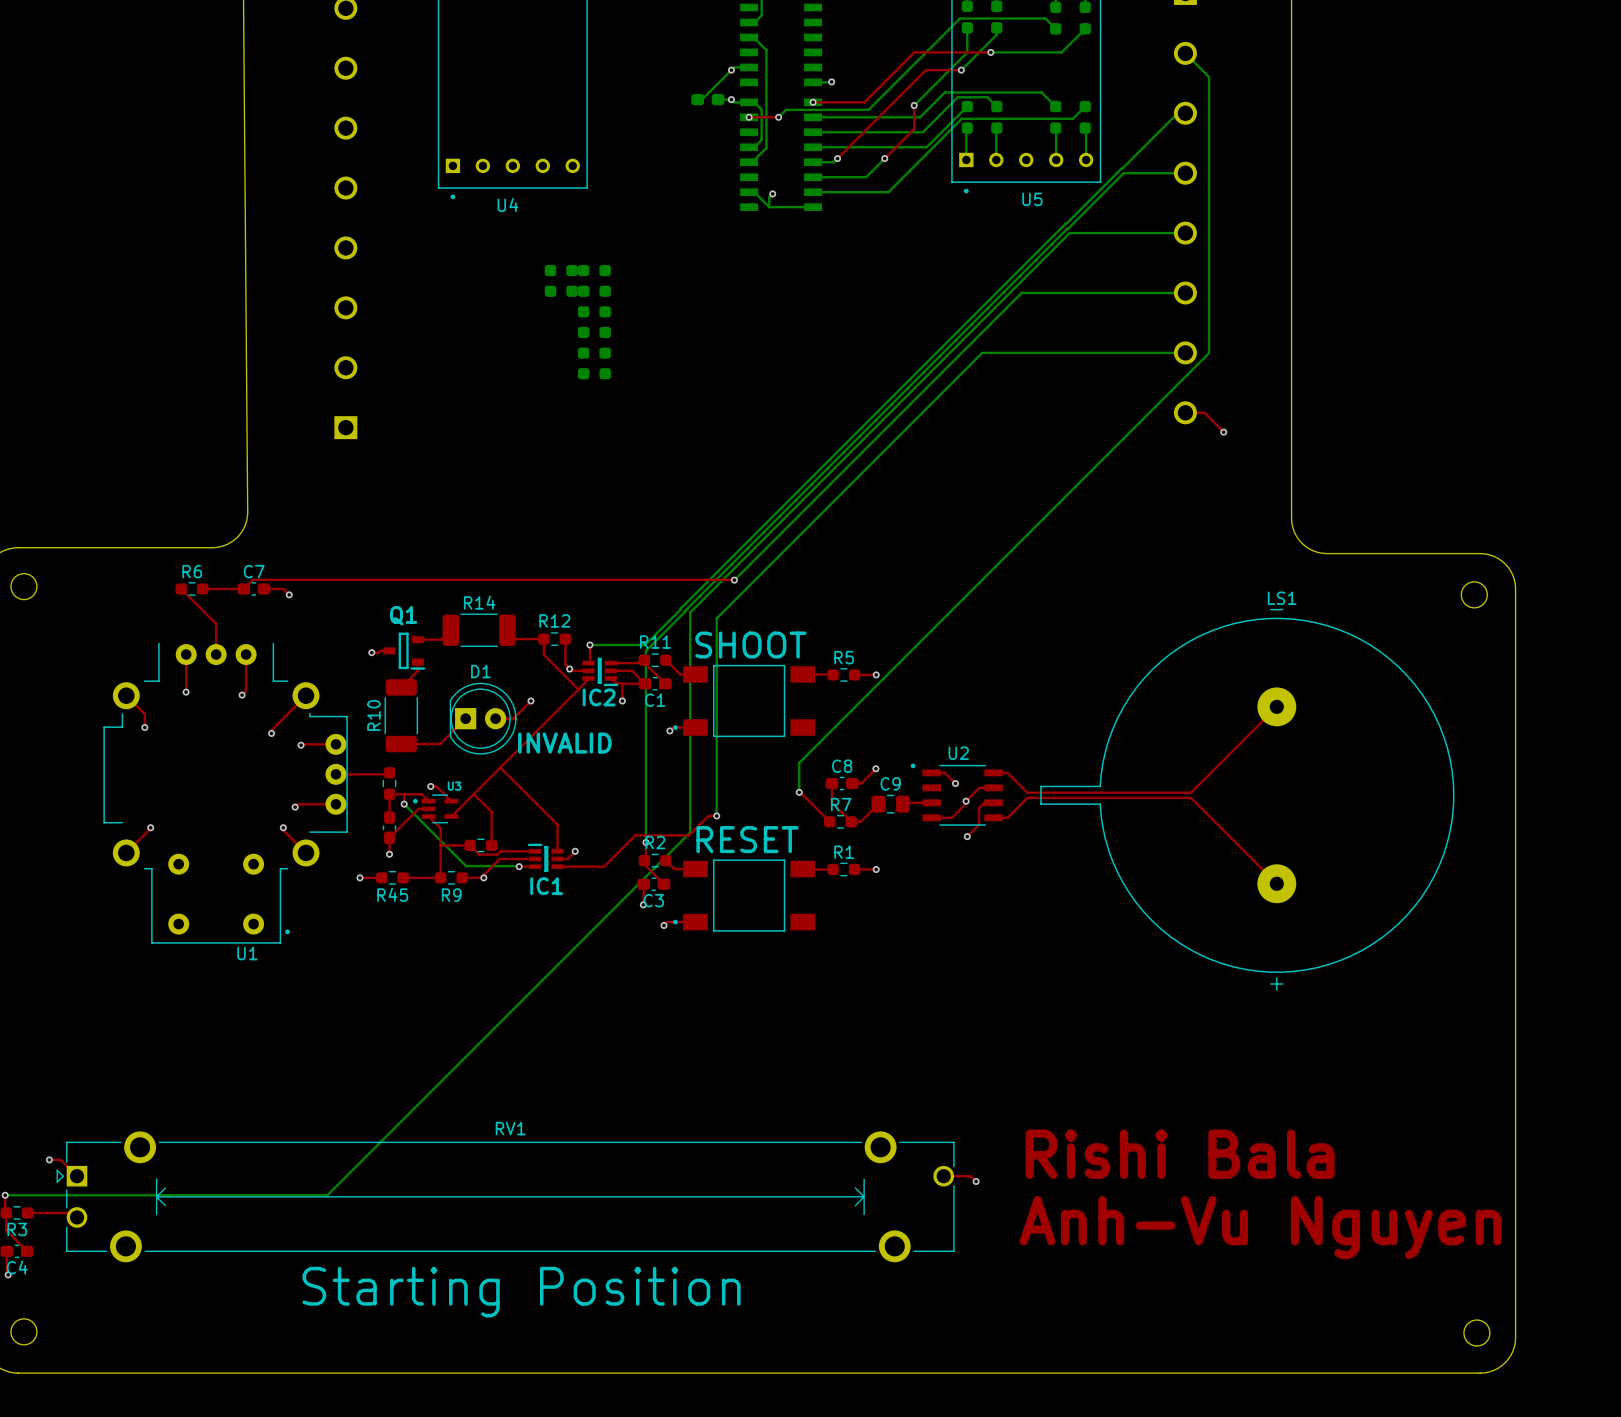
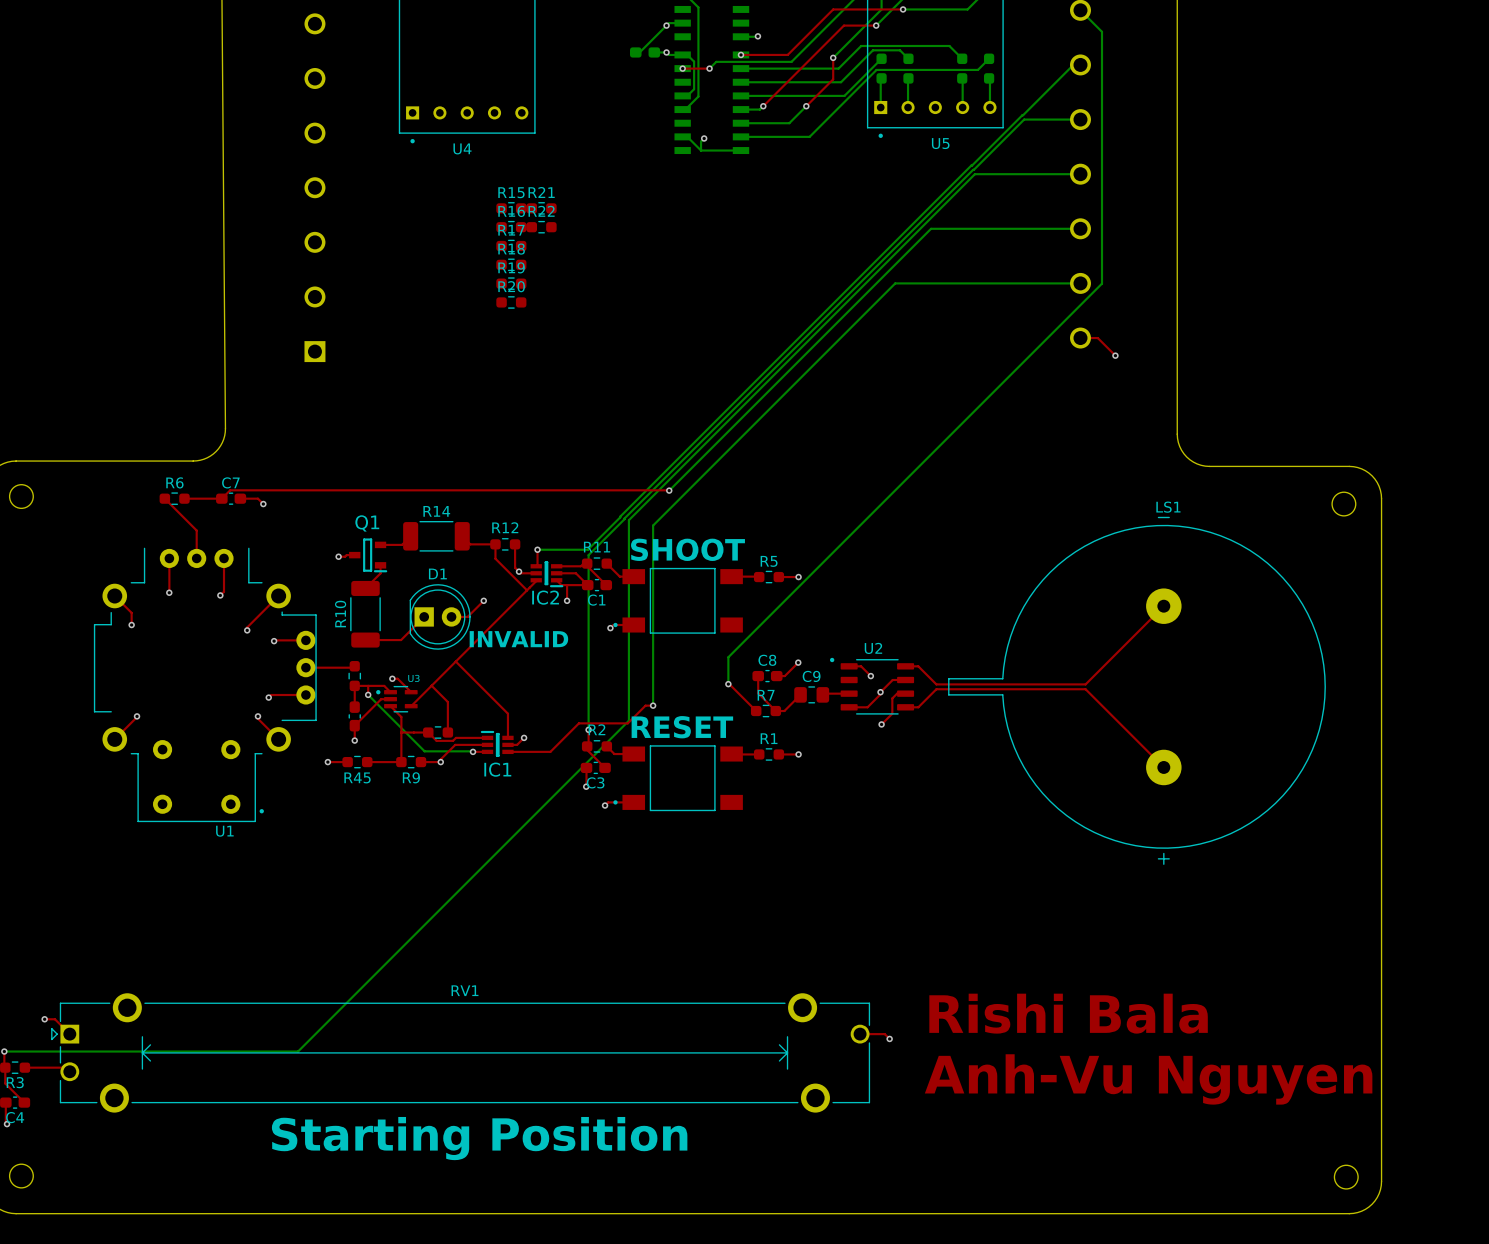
R21 side: bottom (561, 270) -> top (541, 208)
R15 side: bottom (594, 270) -> top (511, 208)
R22 side: bottom (561, 291) -> top (541, 227)
R16 side: bottom (594, 291) -> top (511, 227)
R17 side: bottom (594, 311) -> top (511, 246)
R18 side: bottom (594, 332) -> top (511, 264)
R19 side: bottom (594, 353) -> top (511, 283)
R20 side: bottom (594, 373) -> top (511, 302)

